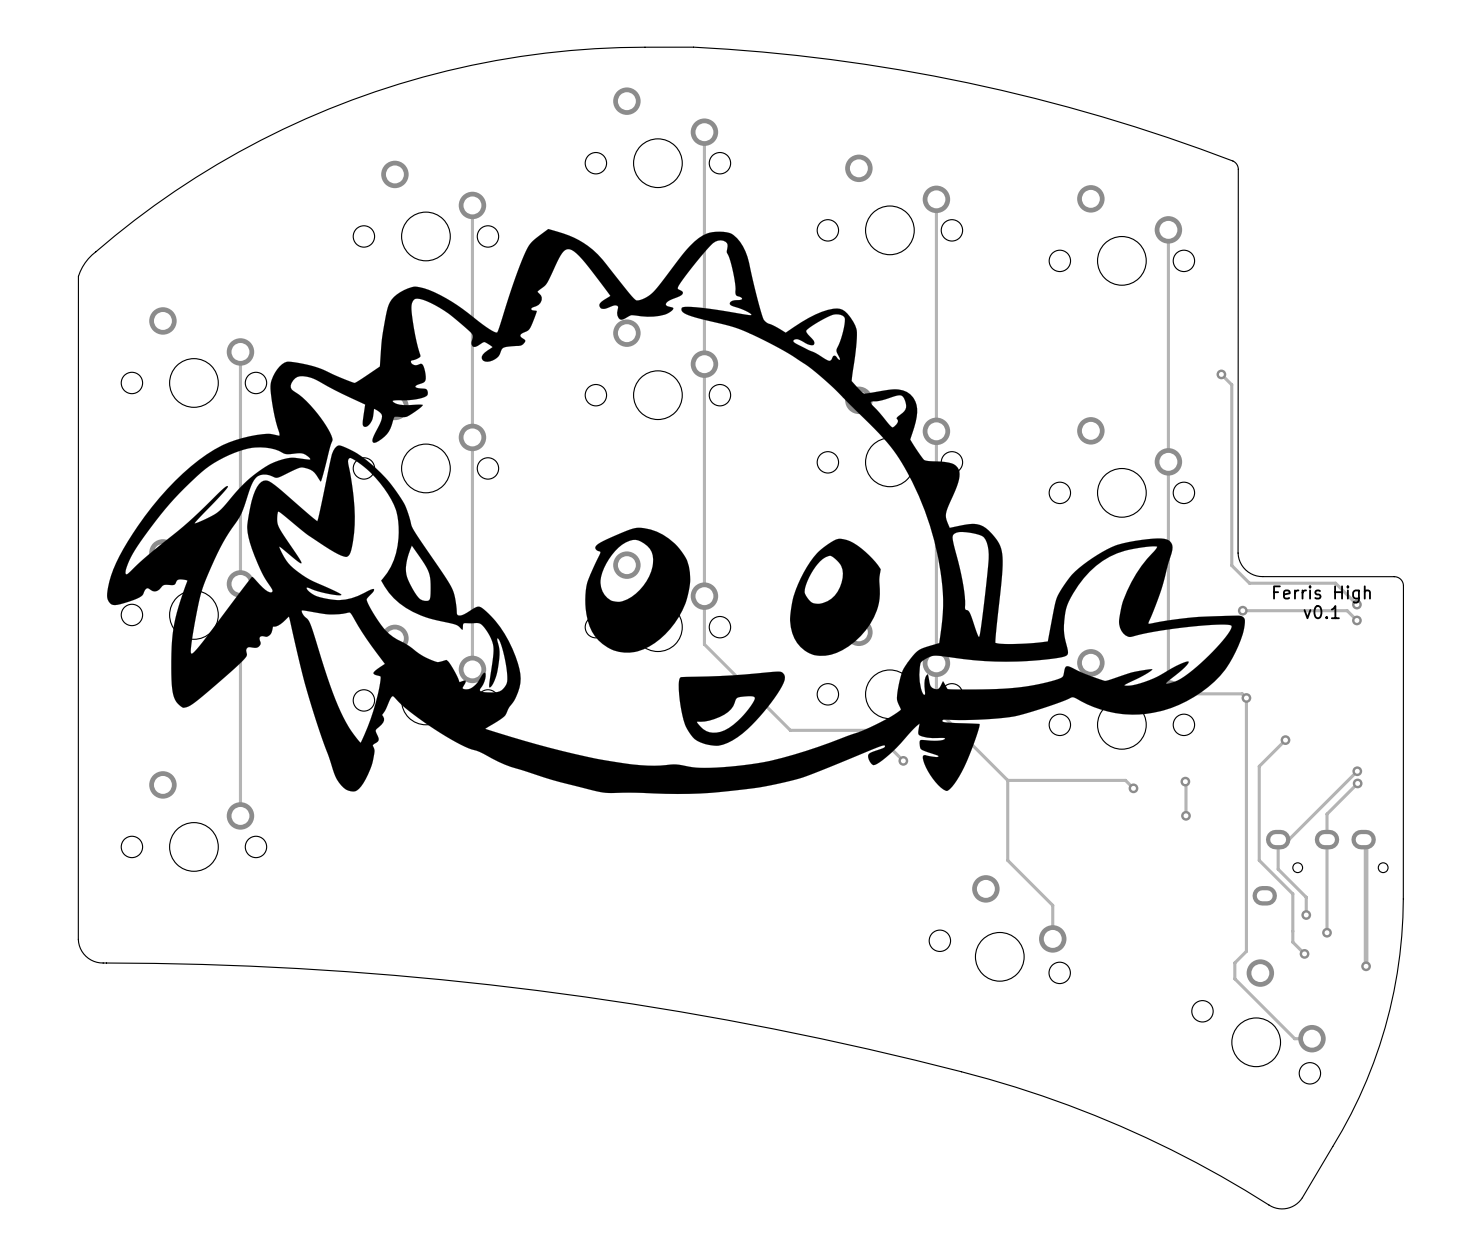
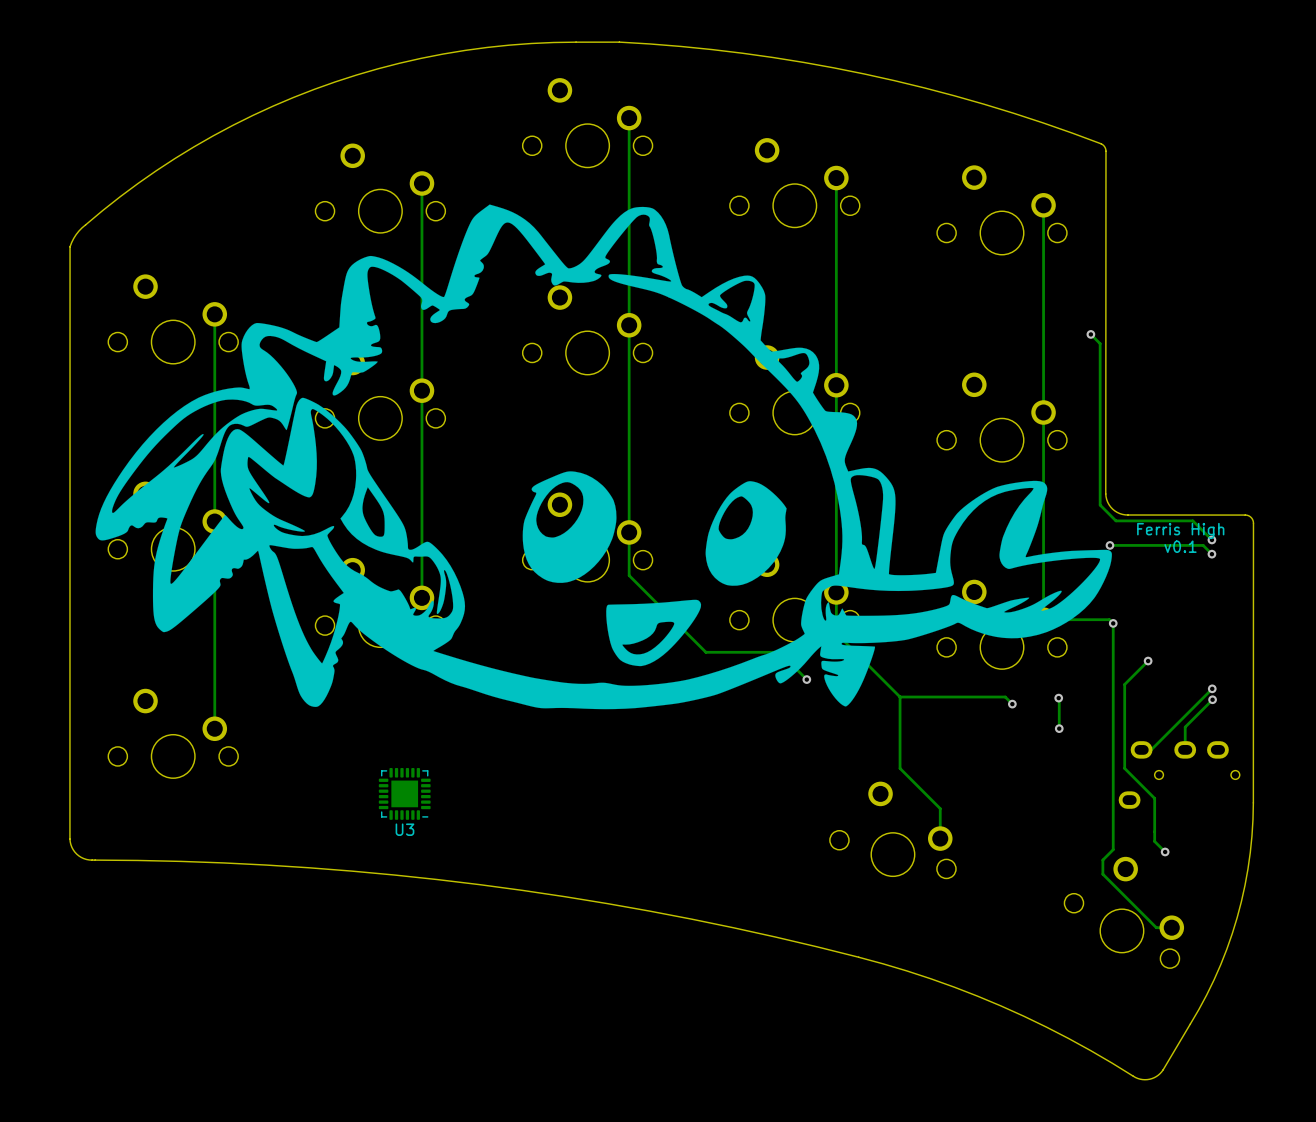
track: (1278, 839) (1278, 869) (1306, 897) (1306, 915) -> none
track: (1327, 839) (1327, 932) -> none
track: (1363, 839) (1366, 842) (1366, 966) -> none
U3: none -> (404, 793)
via: (1306, 915) -> none
via: (1327, 932) -> none
via: (1366, 966) -> none

